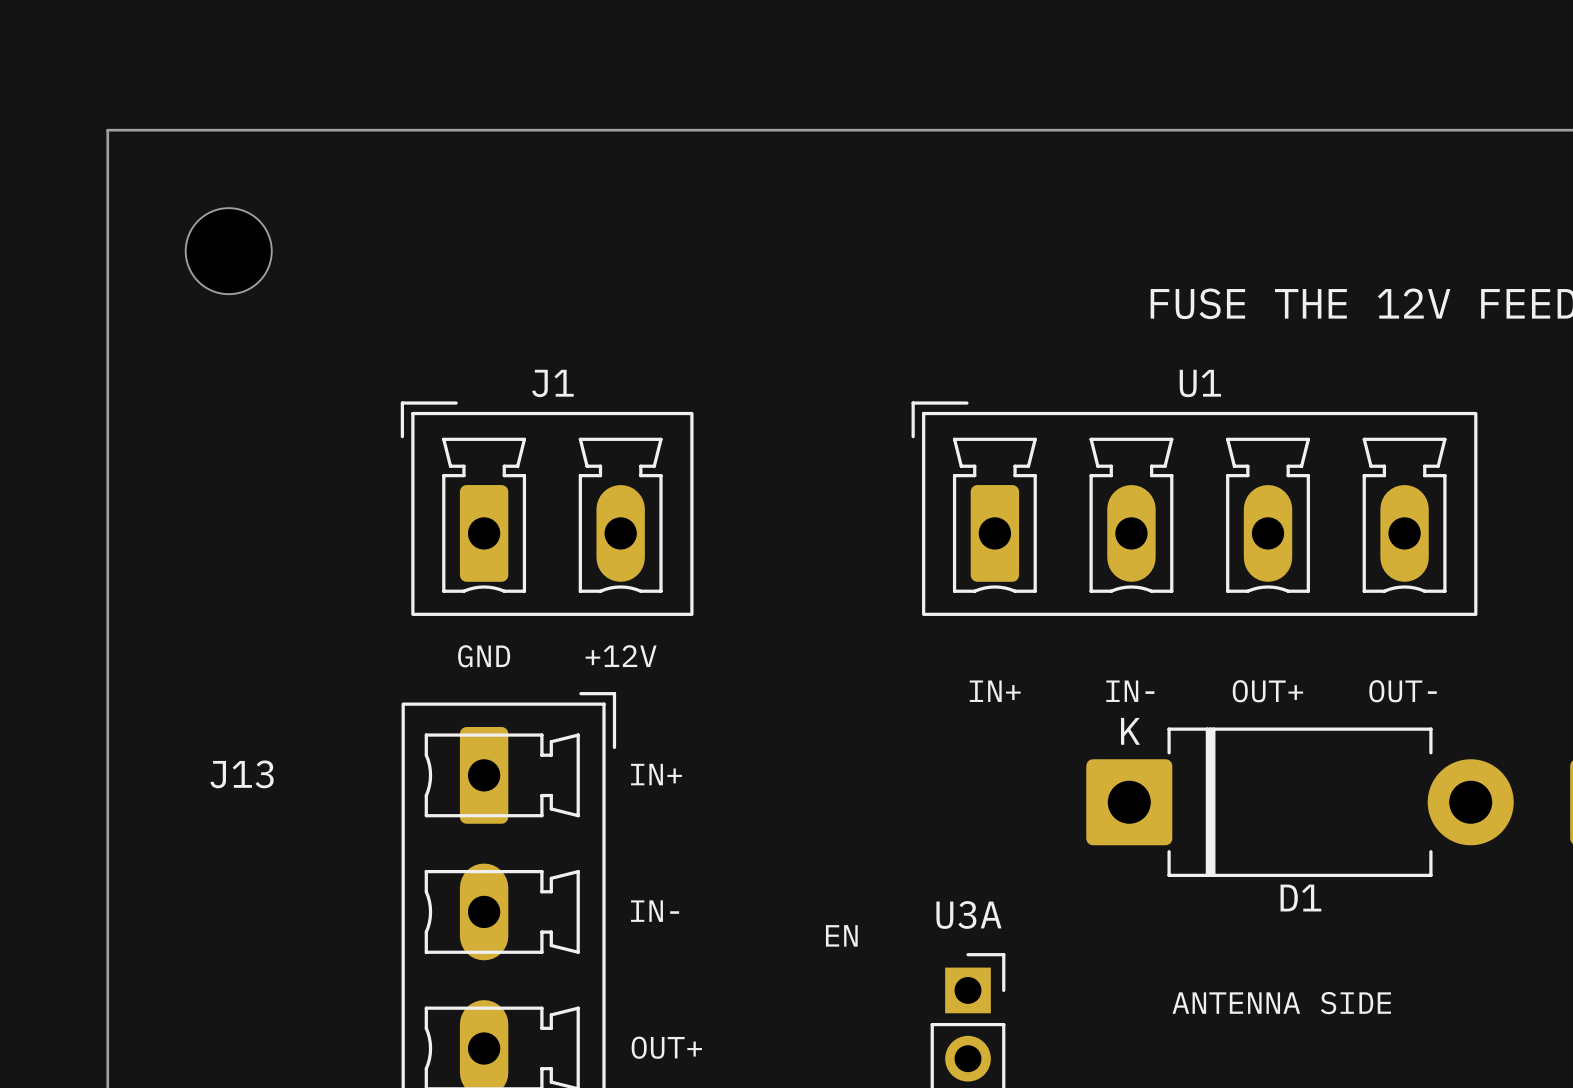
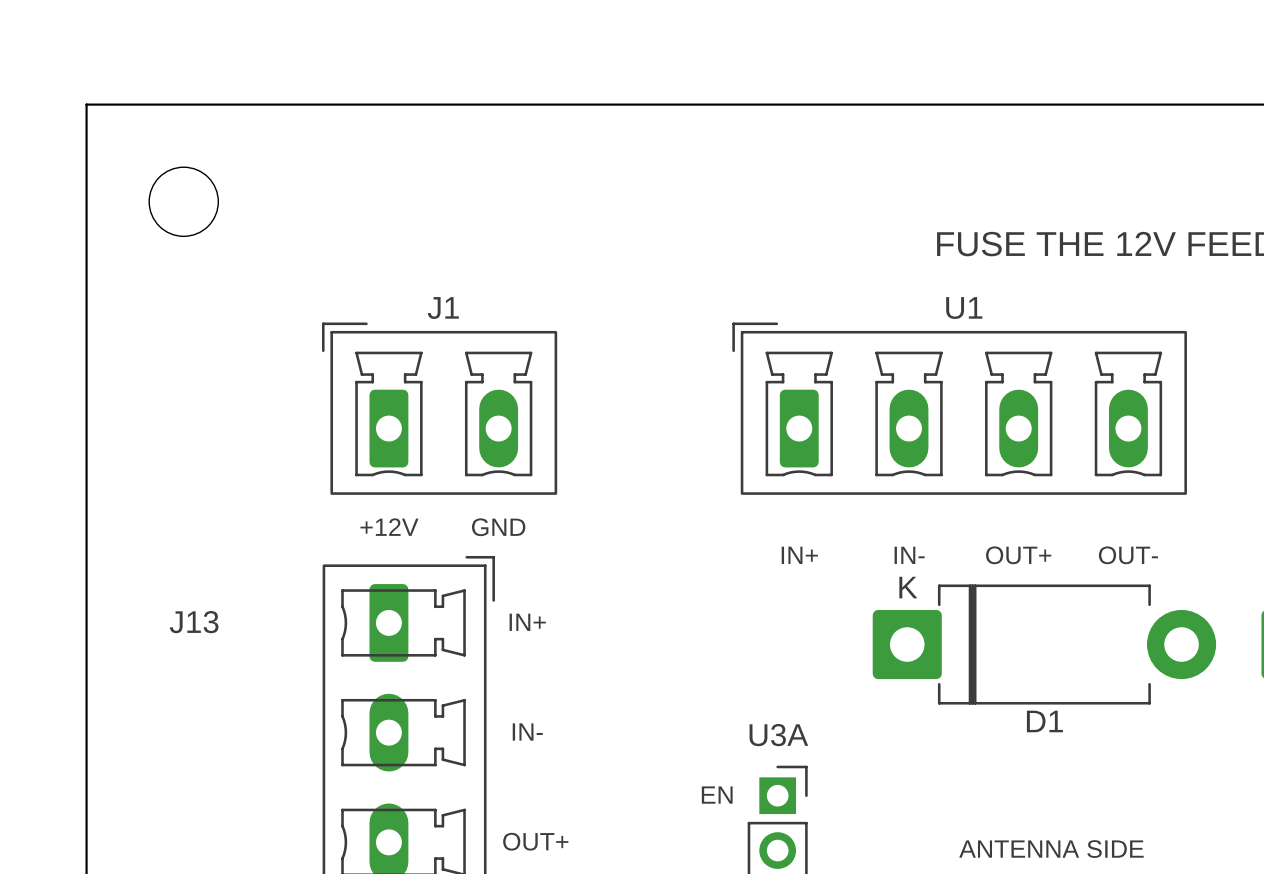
text: GND (484, 656) -> +12V (389, 527)
text: +12V (621, 656) -> GND (498, 527)
text position: EN (841, 935) -> EN (717, 795)
text position: ANTENNA SIDE (1281, 1003) -> ANTENNA SIDE (1051, 849)

